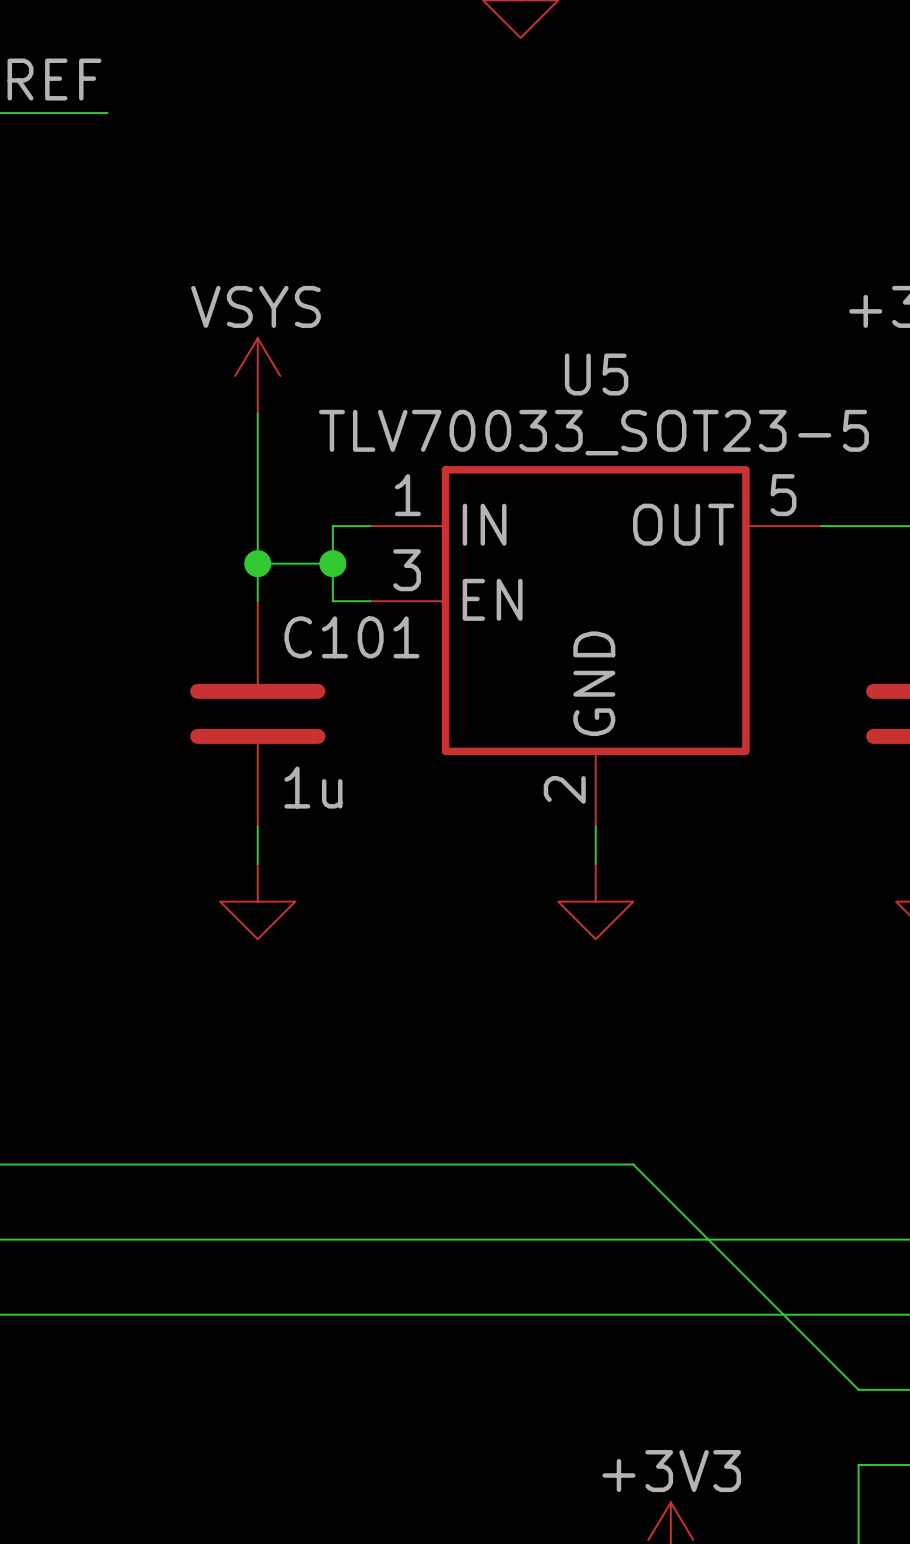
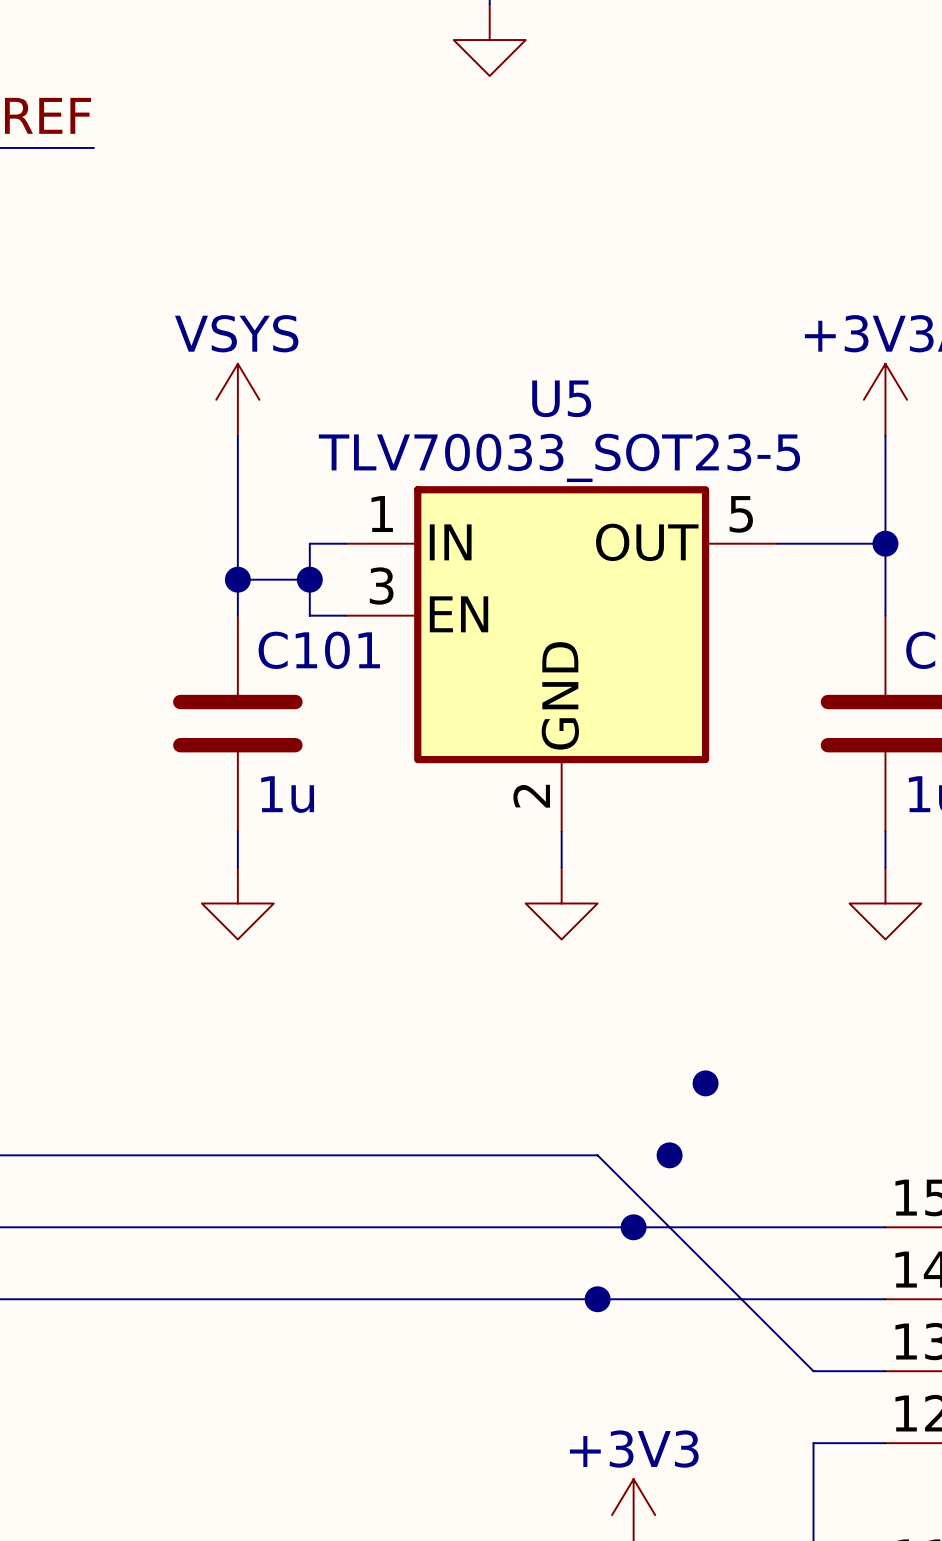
junction: none -> (705, 1083)
junction: none -> (669, 1155)
junction: none -> (633, 1227)
junction: none -> (597, 1299)

